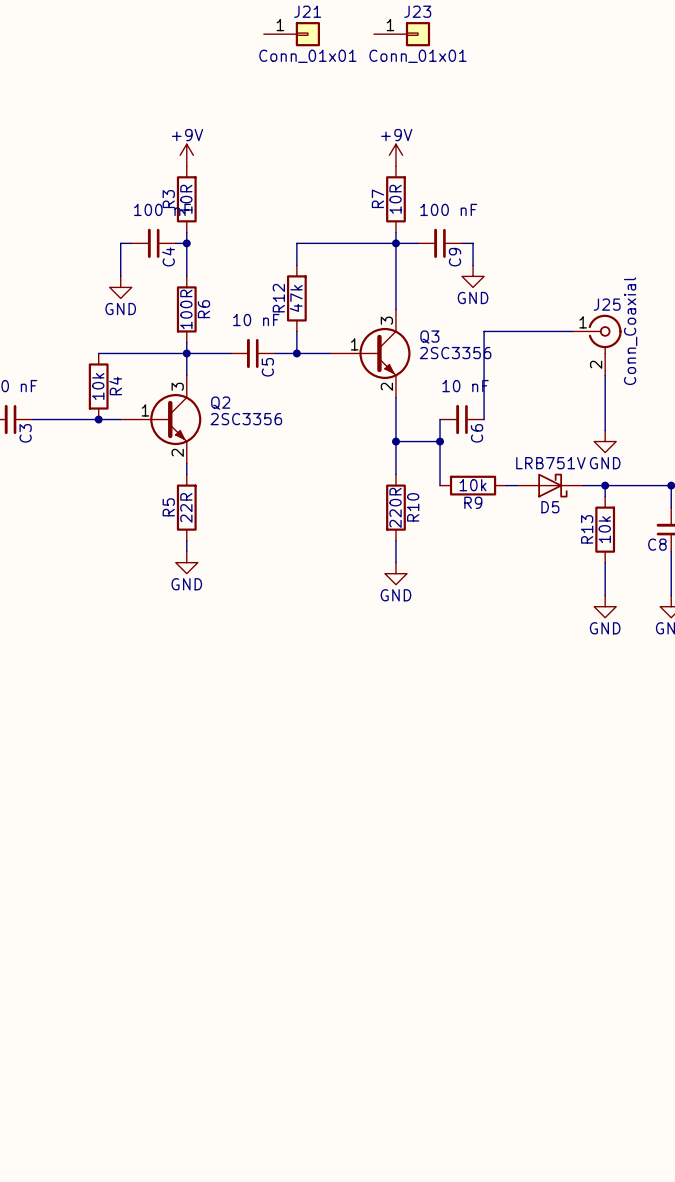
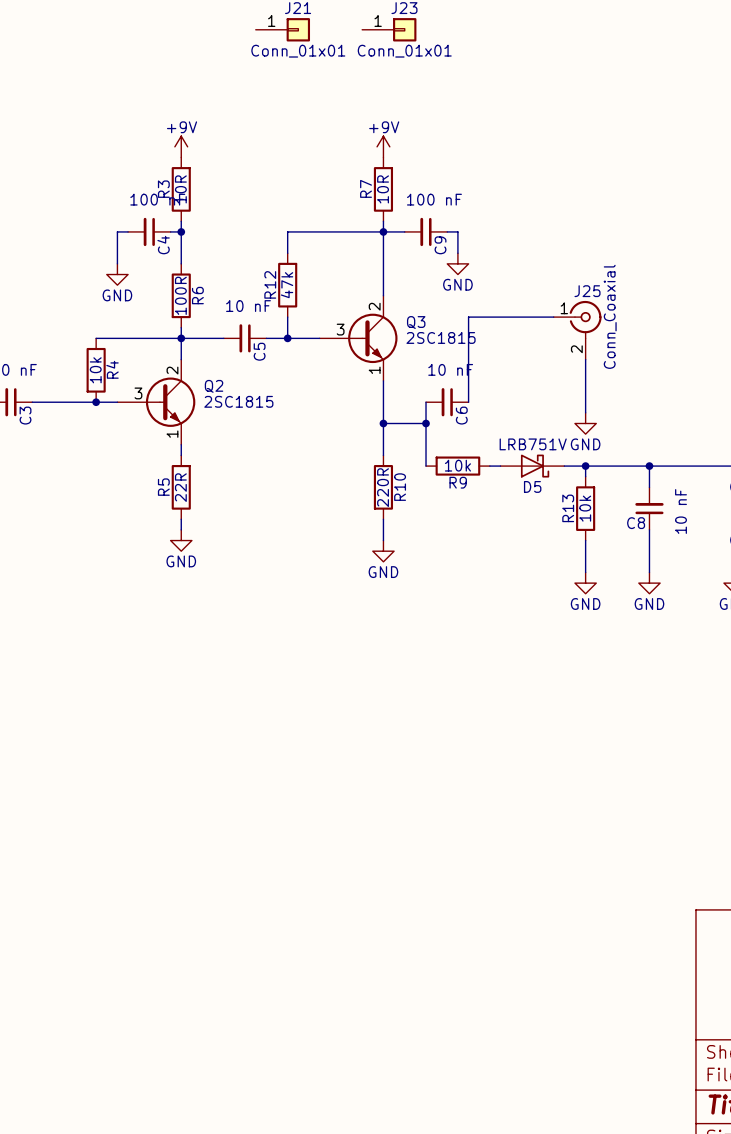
Q3 symbol: [329, 309, 411, 398] -> [319, 295, 398, 381]
Q3 value: 2SC3356 (455, 353) -> 2SC1815 (441, 337)
Q2 symbol: [120, 375, 202, 464] -> [117, 359, 196, 445]
Q2 value: 2SC3356 (246, 419) -> 2SC1815 (238, 401)

